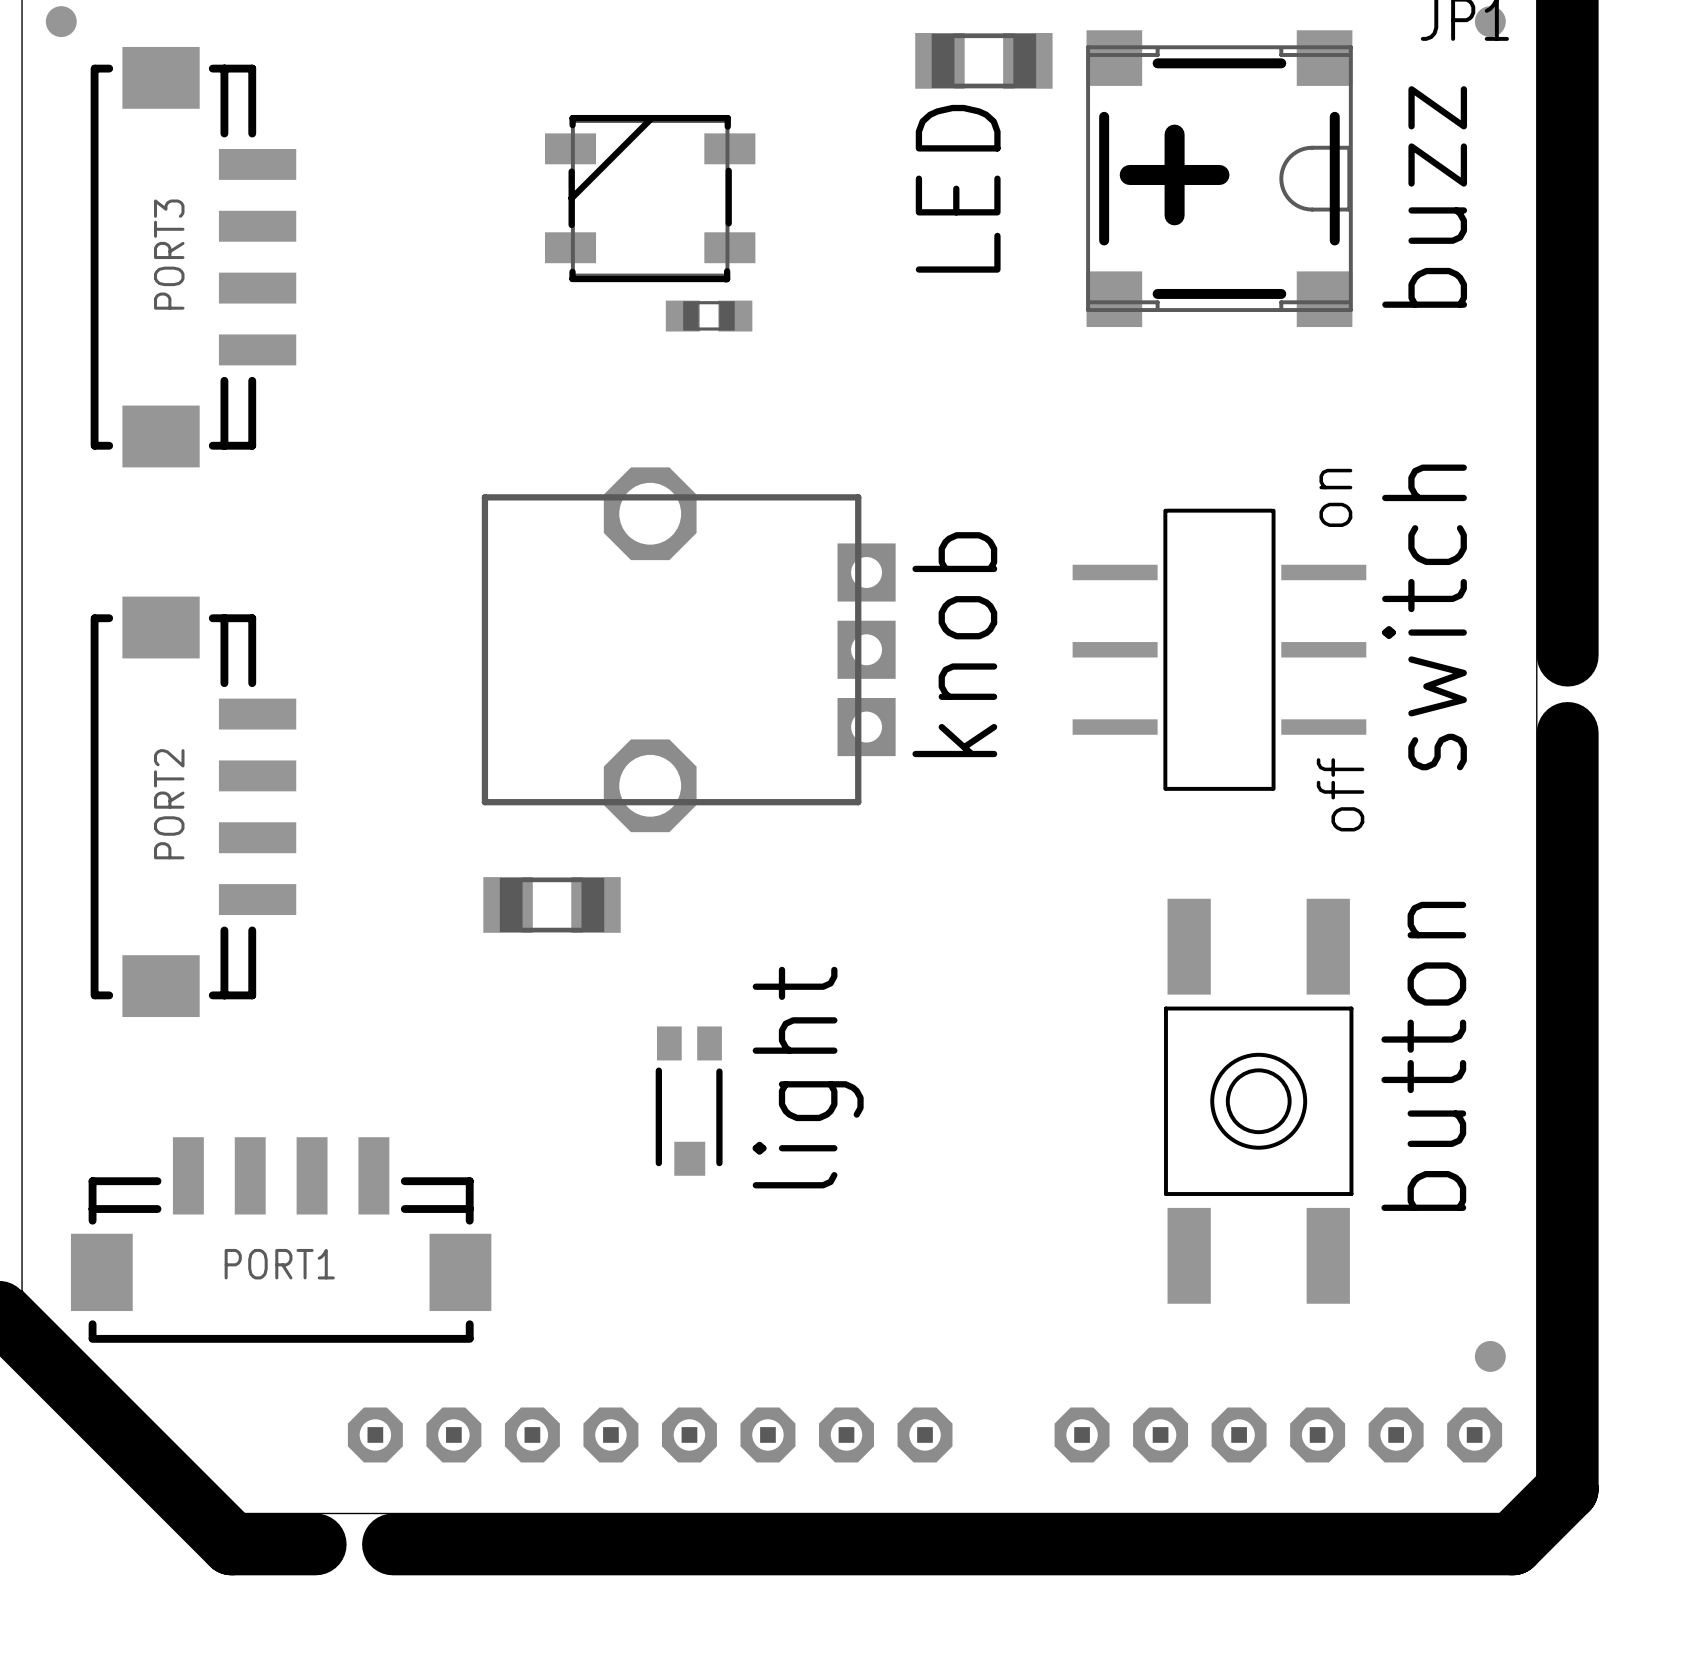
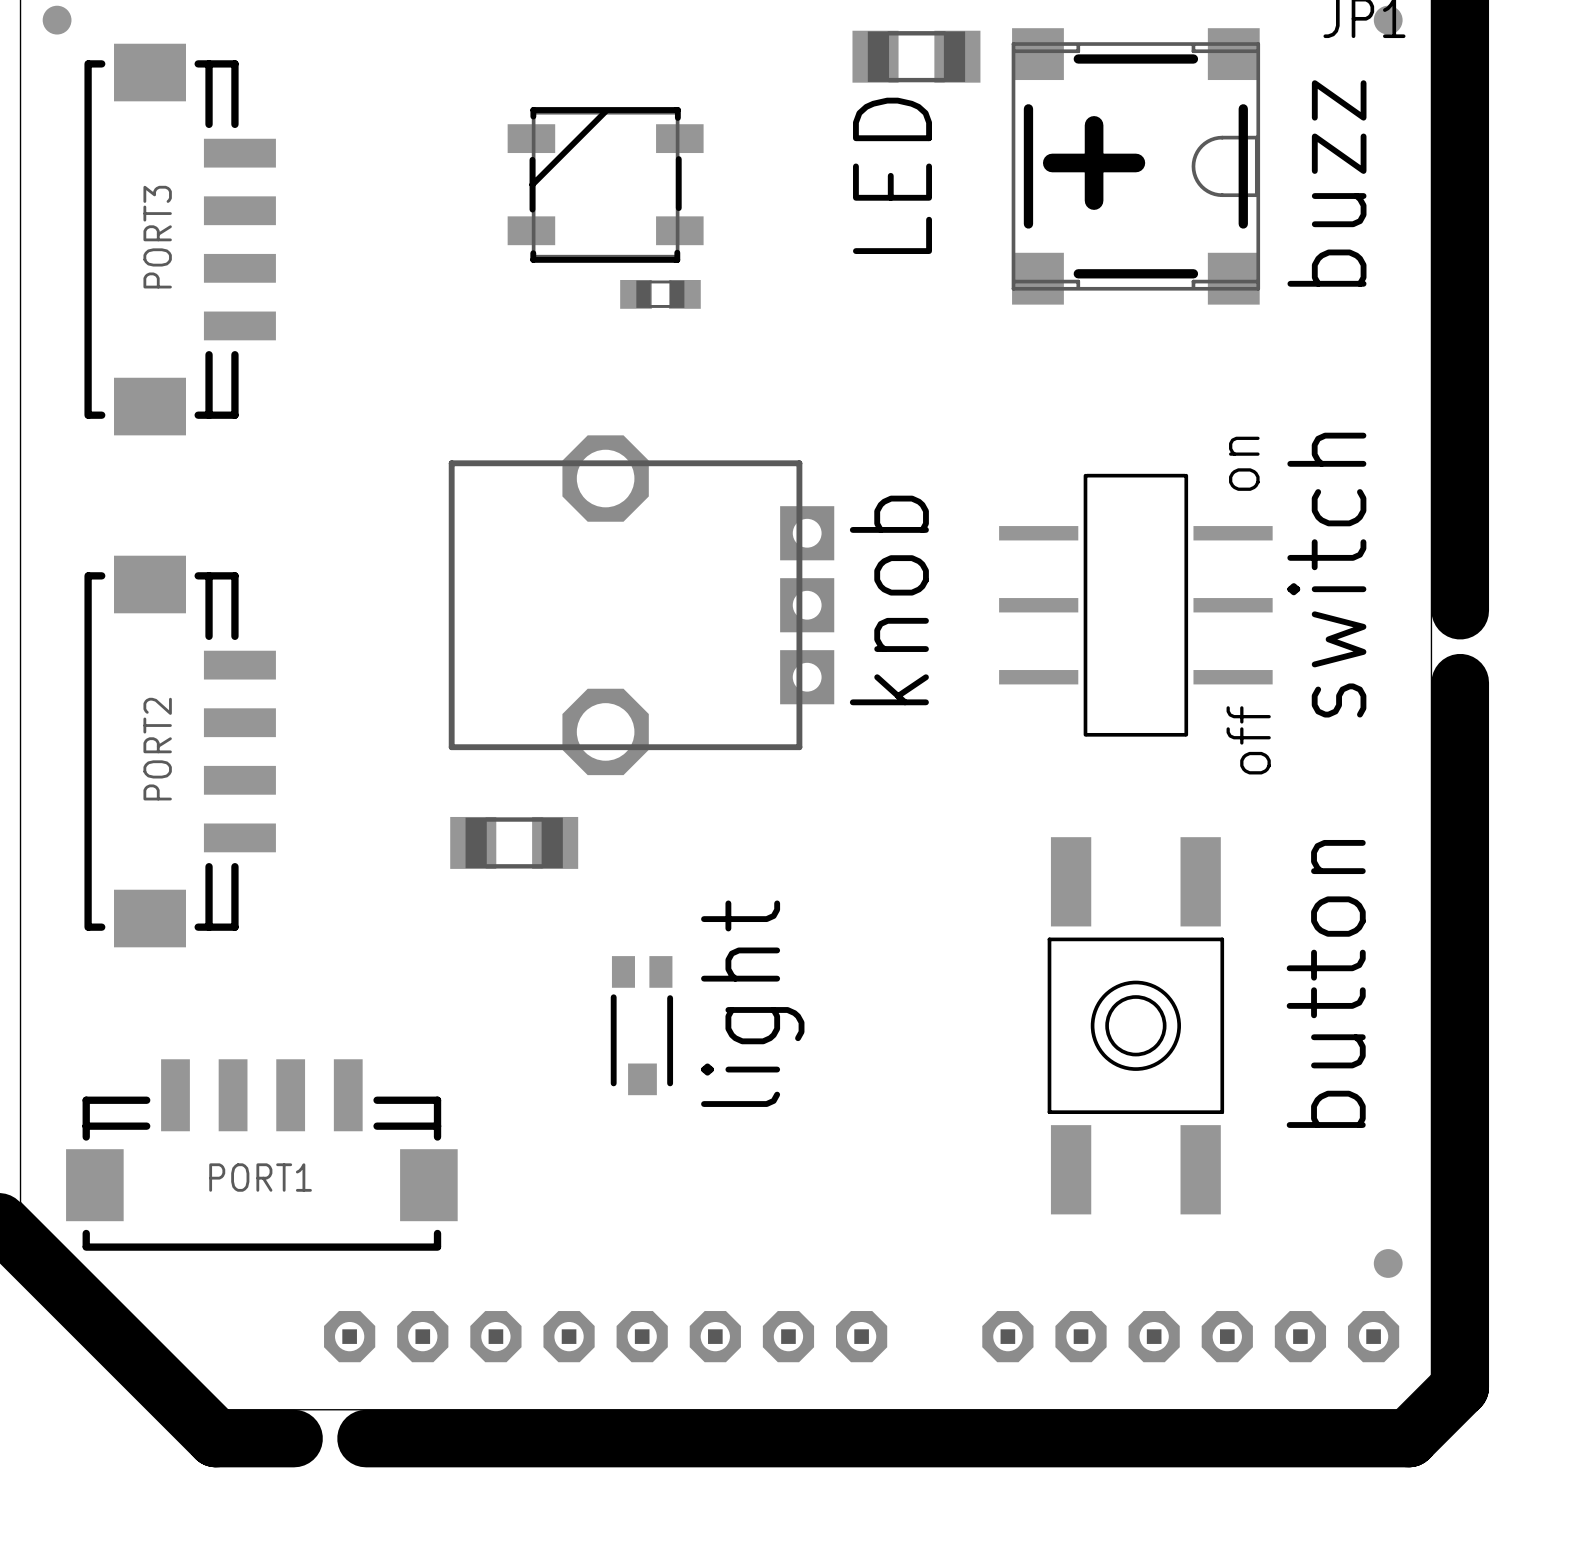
part position: (1258, 1101) -> (1135, 1025)

